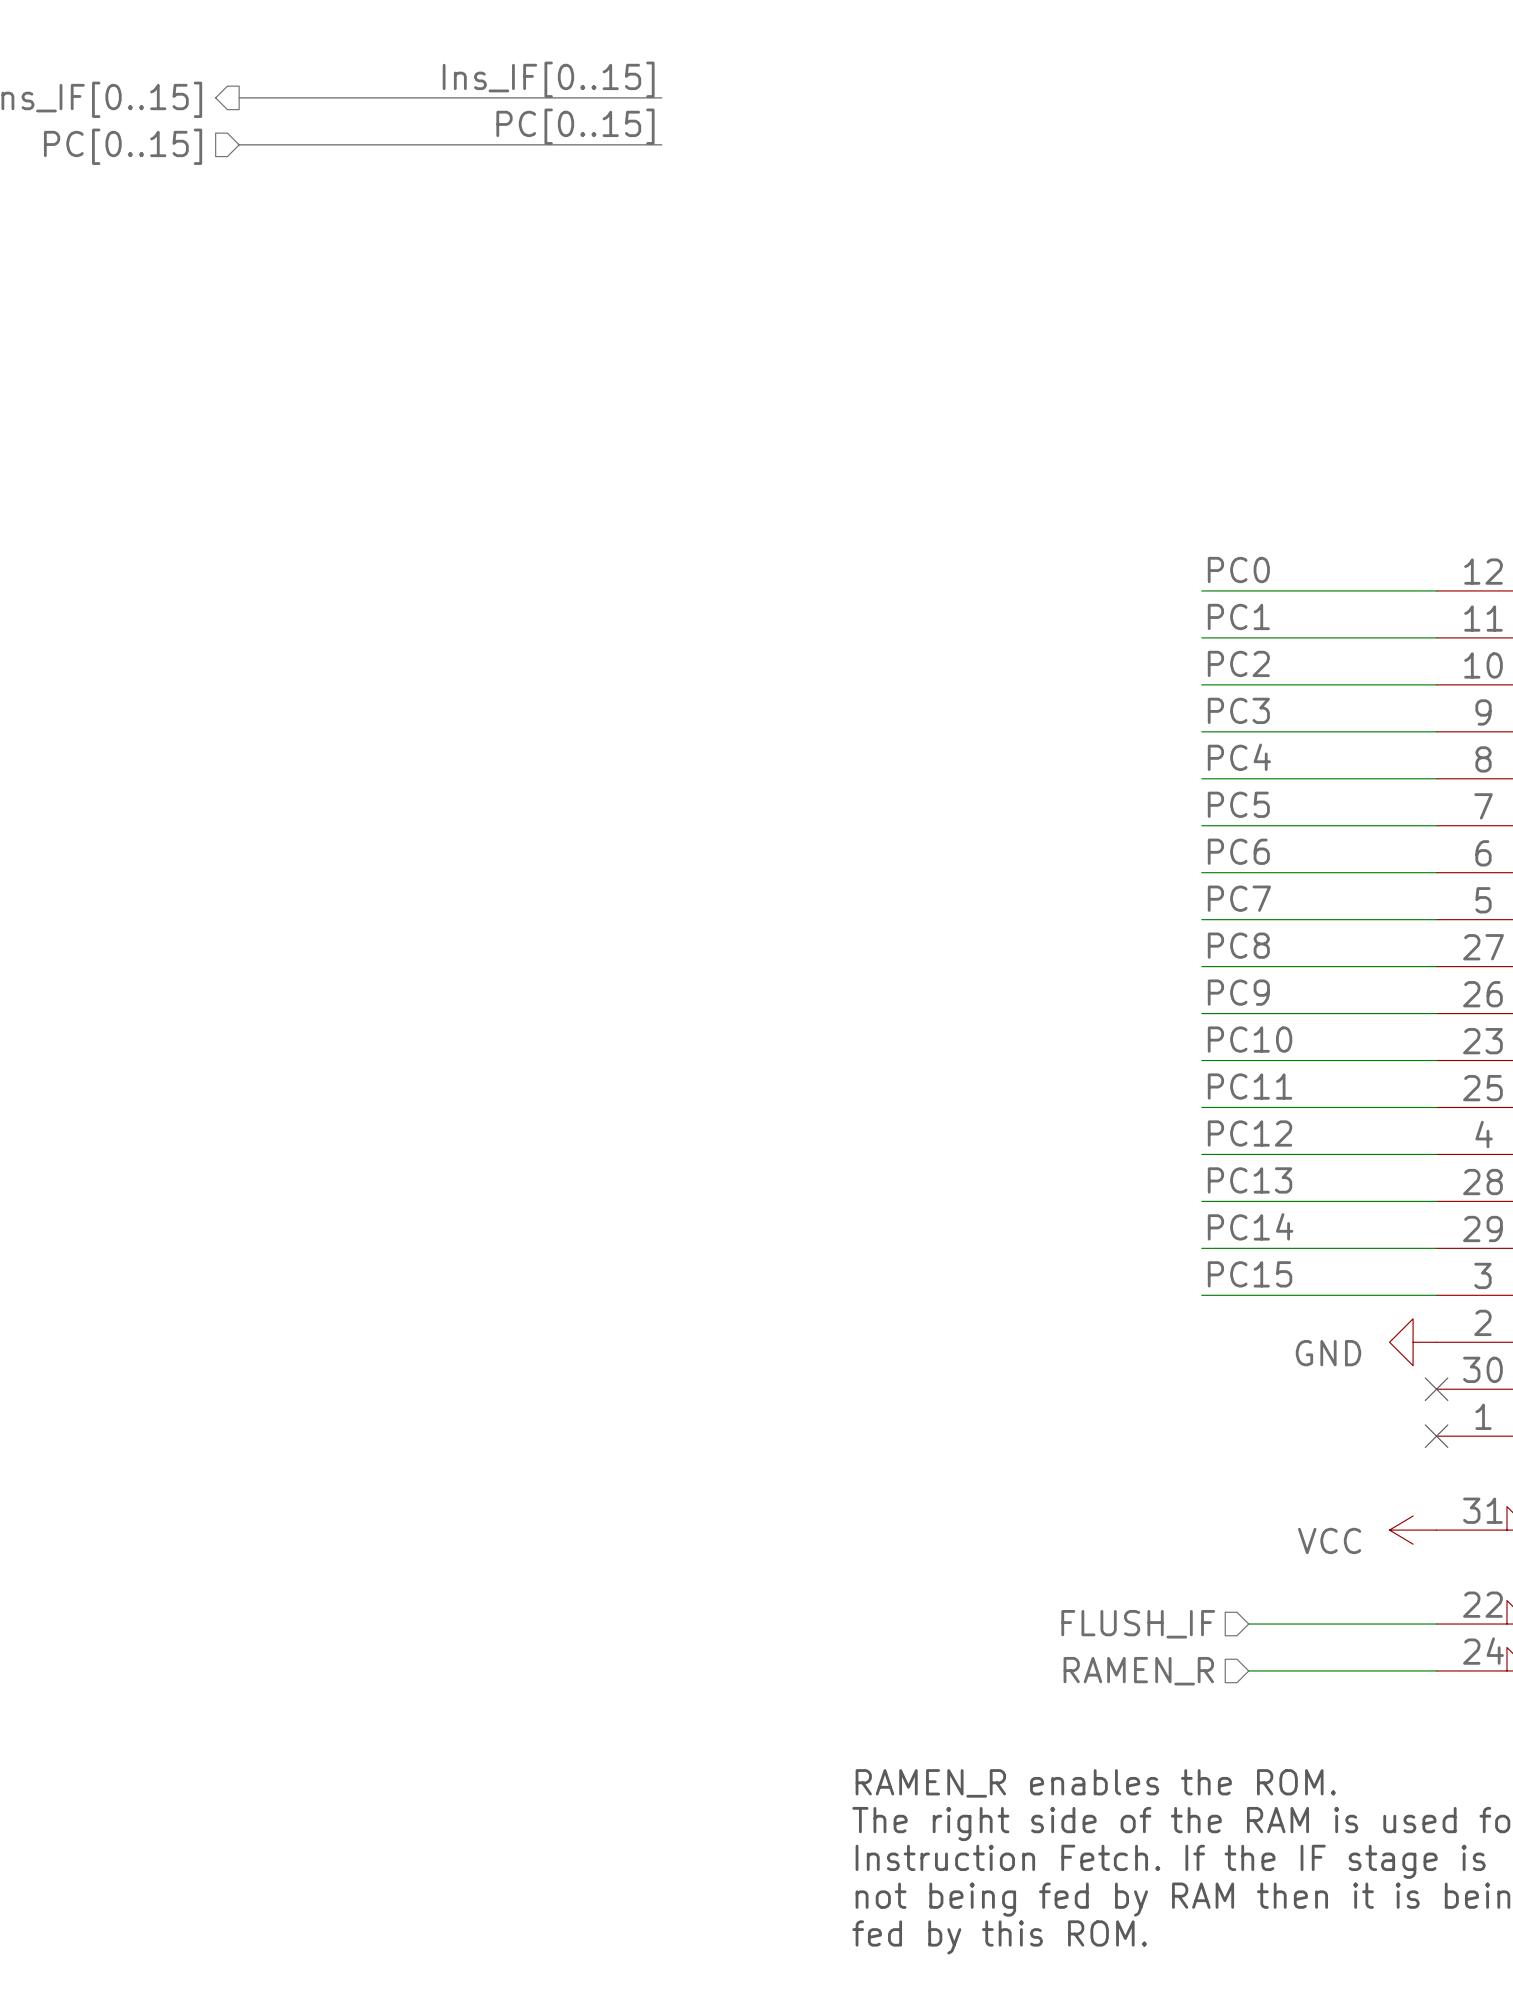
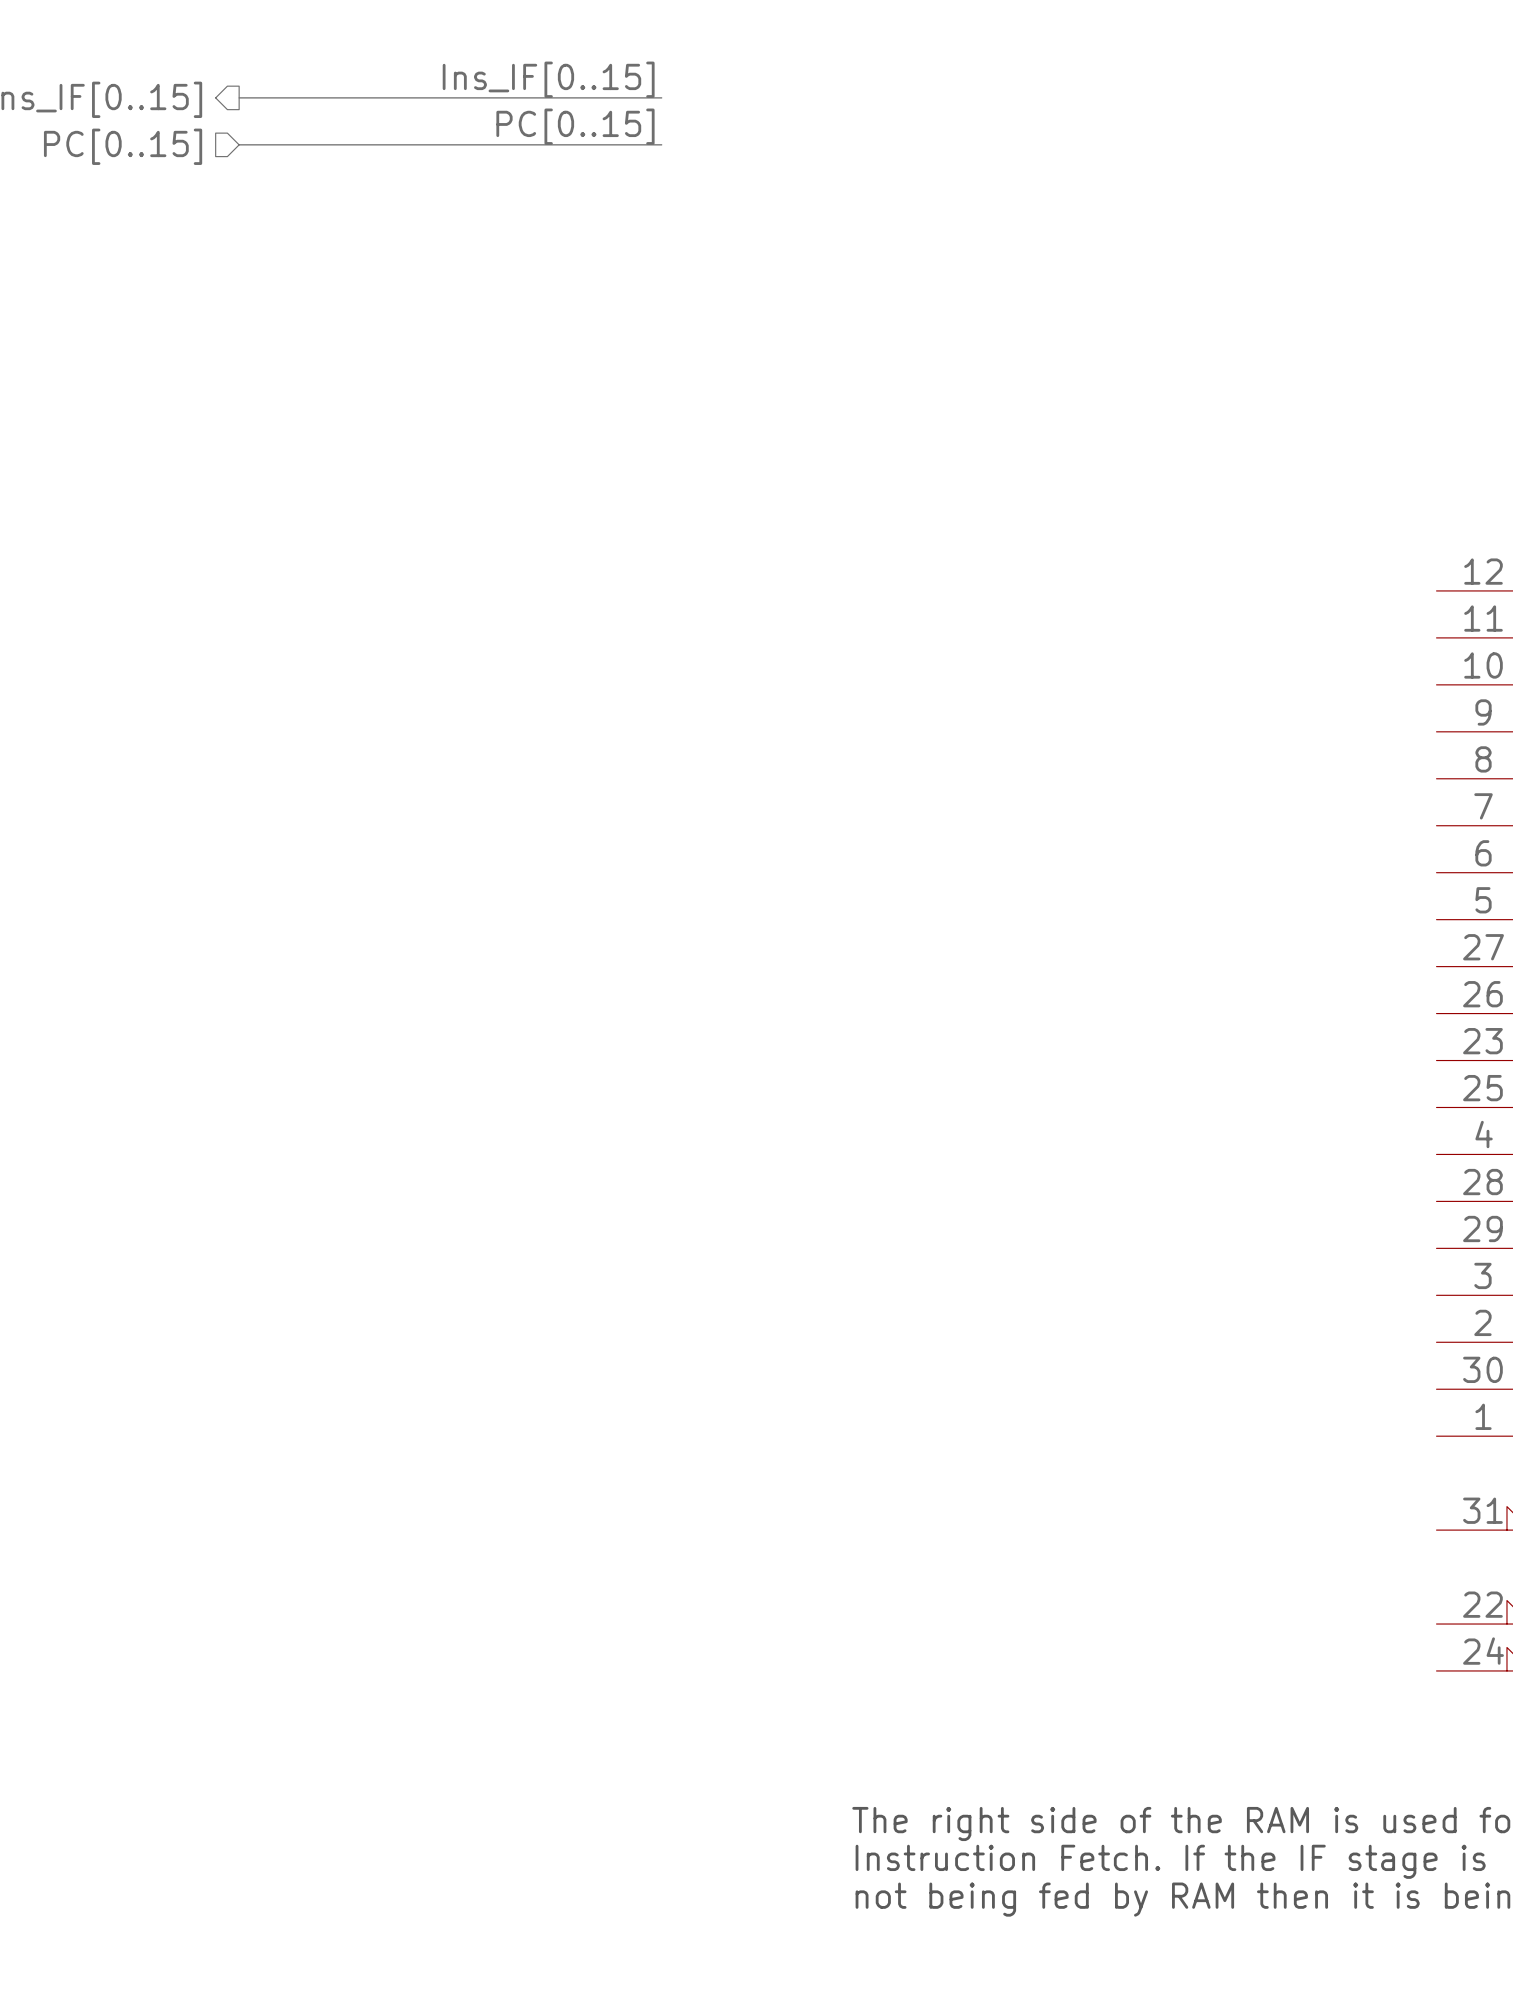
label: PC0 (1238, 570) -> none
wire: (1201, 590) (1436, 590) -> none
label: PC1 (1238, 616) -> none
wire: (1201, 637) (1436, 637) -> none
label: PC2 (1238, 663) -> none
wire: (1201, 684) (1436, 684) -> none
label: PC3 (1238, 710) -> none
wire: (1201, 731) (1436, 731) -> none
label: PC4 (1239, 757) -> none
wire: (1201, 778) (1436, 778) -> none
label: PC5 (1238, 804) -> none
wire: (1201, 825) (1436, 825) -> none
label: PC6 (1238, 851) -> none
wire: (1201, 872) (1436, 872) -> none
label: PC7 (1239, 898) -> none
wire: (1201, 919) (1436, 919) -> none
label: PC8 (1238, 945) -> none
wire: (1201, 966) (1436, 966) -> none
label: PC9 (1238, 992) -> none
wire: (1201, 1013) (1436, 1013) -> none
label: PC10 (1250, 1039) -> none
wire: (1201, 1060) (1436, 1060) -> none
label: PC11 (1250, 1086) -> none
wire: (1201, 1107) (1436, 1107) -> none
label: PC12 (1250, 1133) -> none
wire: (1201, 1154) (1436, 1154) -> none
label: PC13 (1250, 1180) -> none
wire: (1201, 1201) (1436, 1201) -> none
label: PC14 (1250, 1226) -> none
wire: (1201, 1248) (1436, 1248) -> none
label: PC15 (1250, 1274) -> none
wire: (1201, 1295) (1436, 1295) -> none
power symbol: GND (1413, 1342) -> none
no-connect mark: (1436, 1389) -> none
no-connect mark: (1436, 1436) -> none
power symbol: VCC (1413, 1530) -> none
hierarchical label: FLUSH_IF (1138, 1624) -> none
wire: (1248, 1624) (1436, 1624) -> none
wire: (1248, 1670) (1436, 1670) -> none
hierarchical label: RAMEN_R (1138, 1671) -> none
text: RAMEN_R enables the ROM. (1095, 1783) -> none
text: fed by this ROM. (999, 1937) -> none

